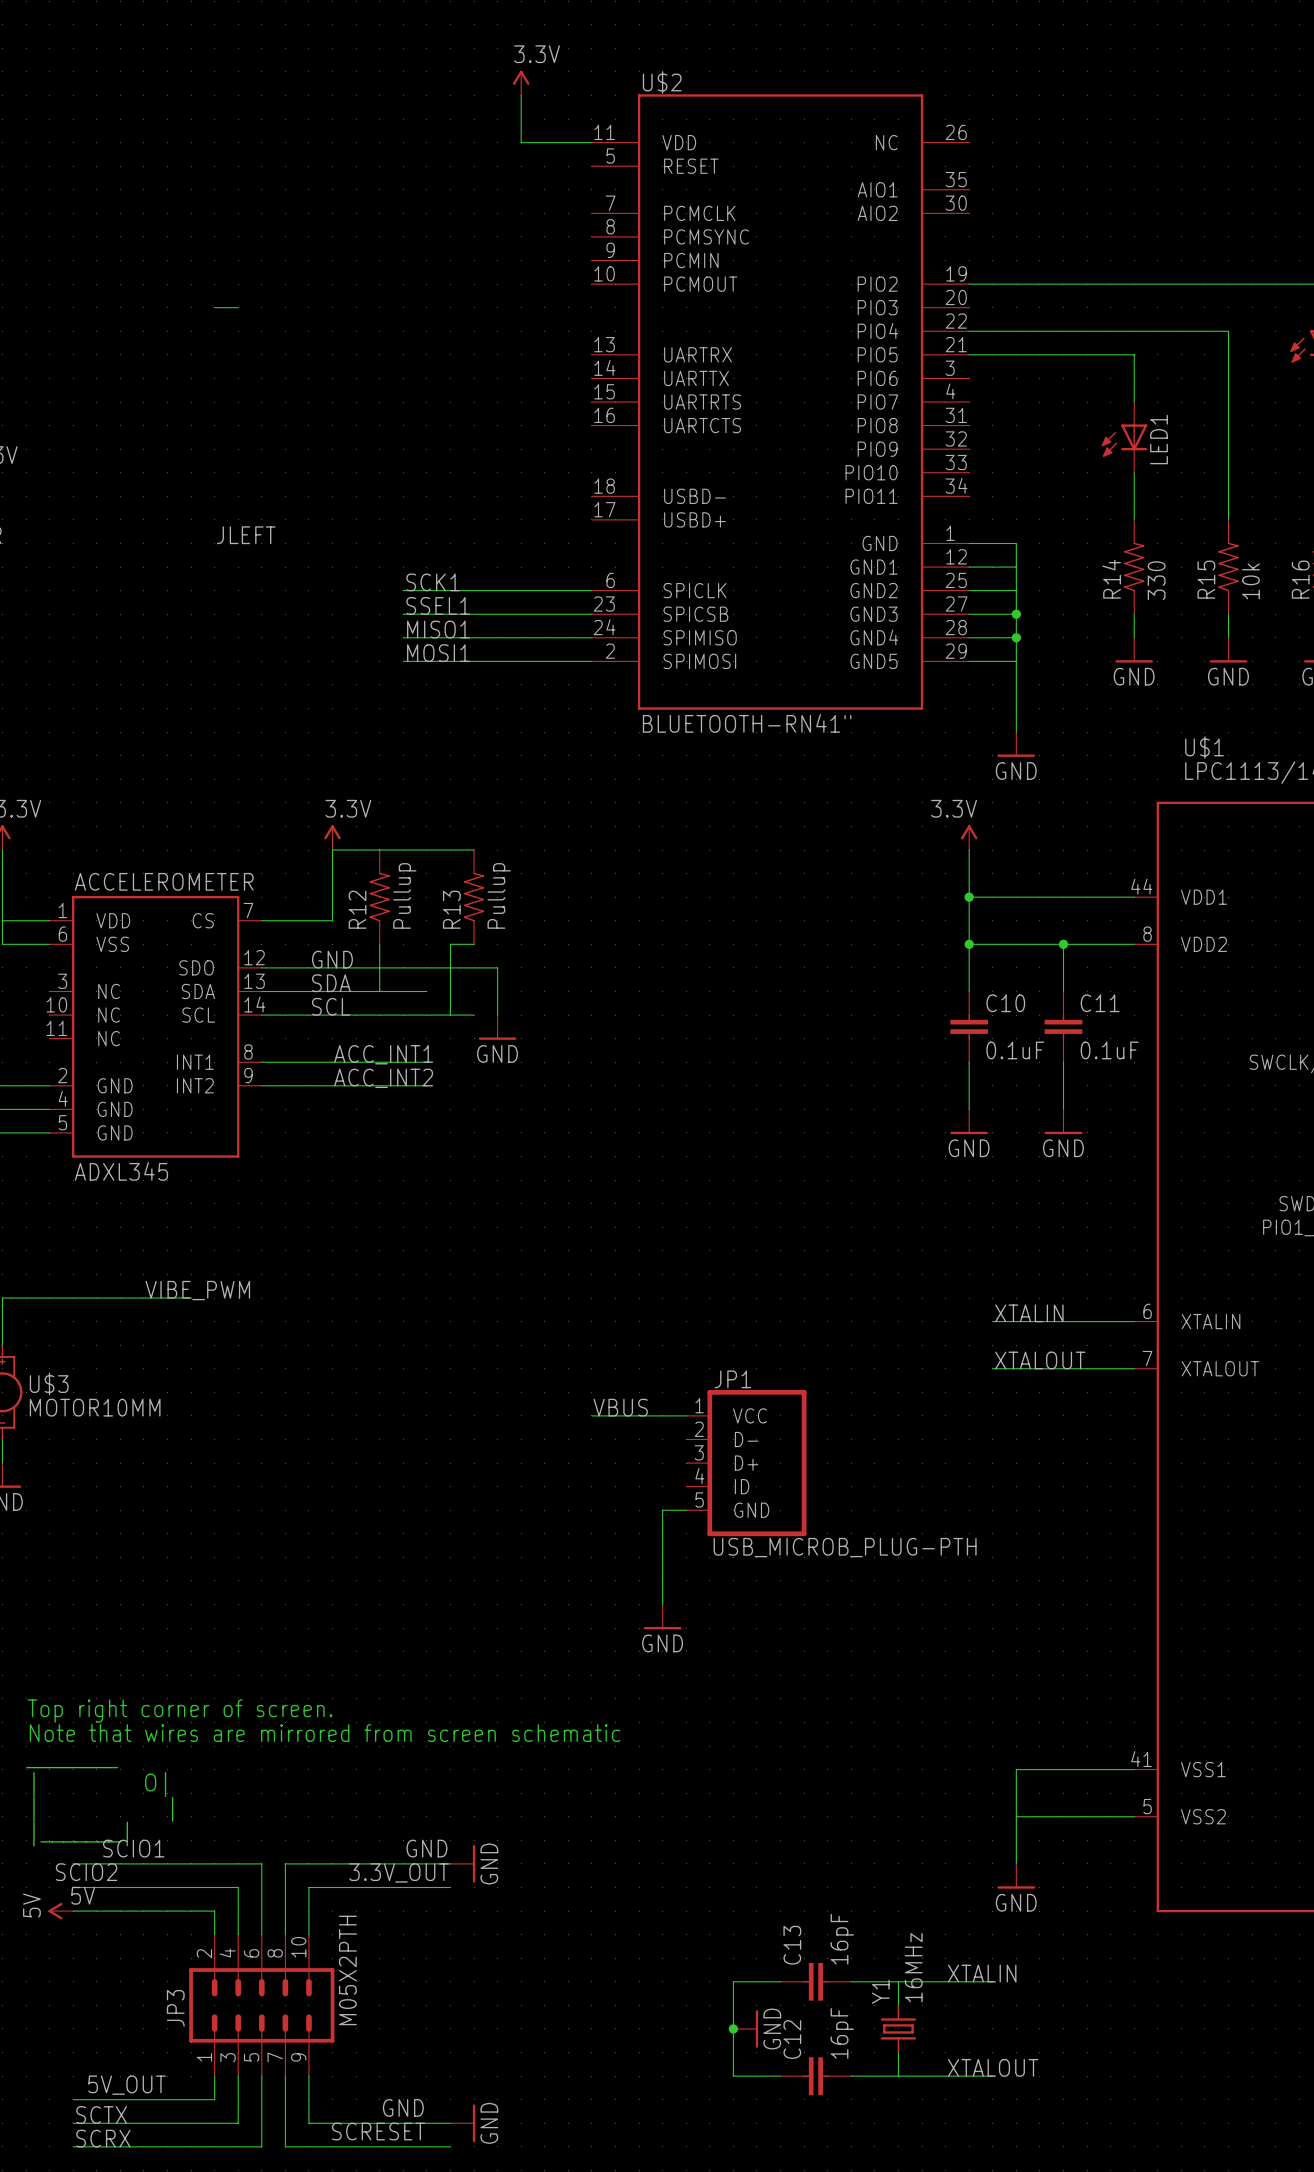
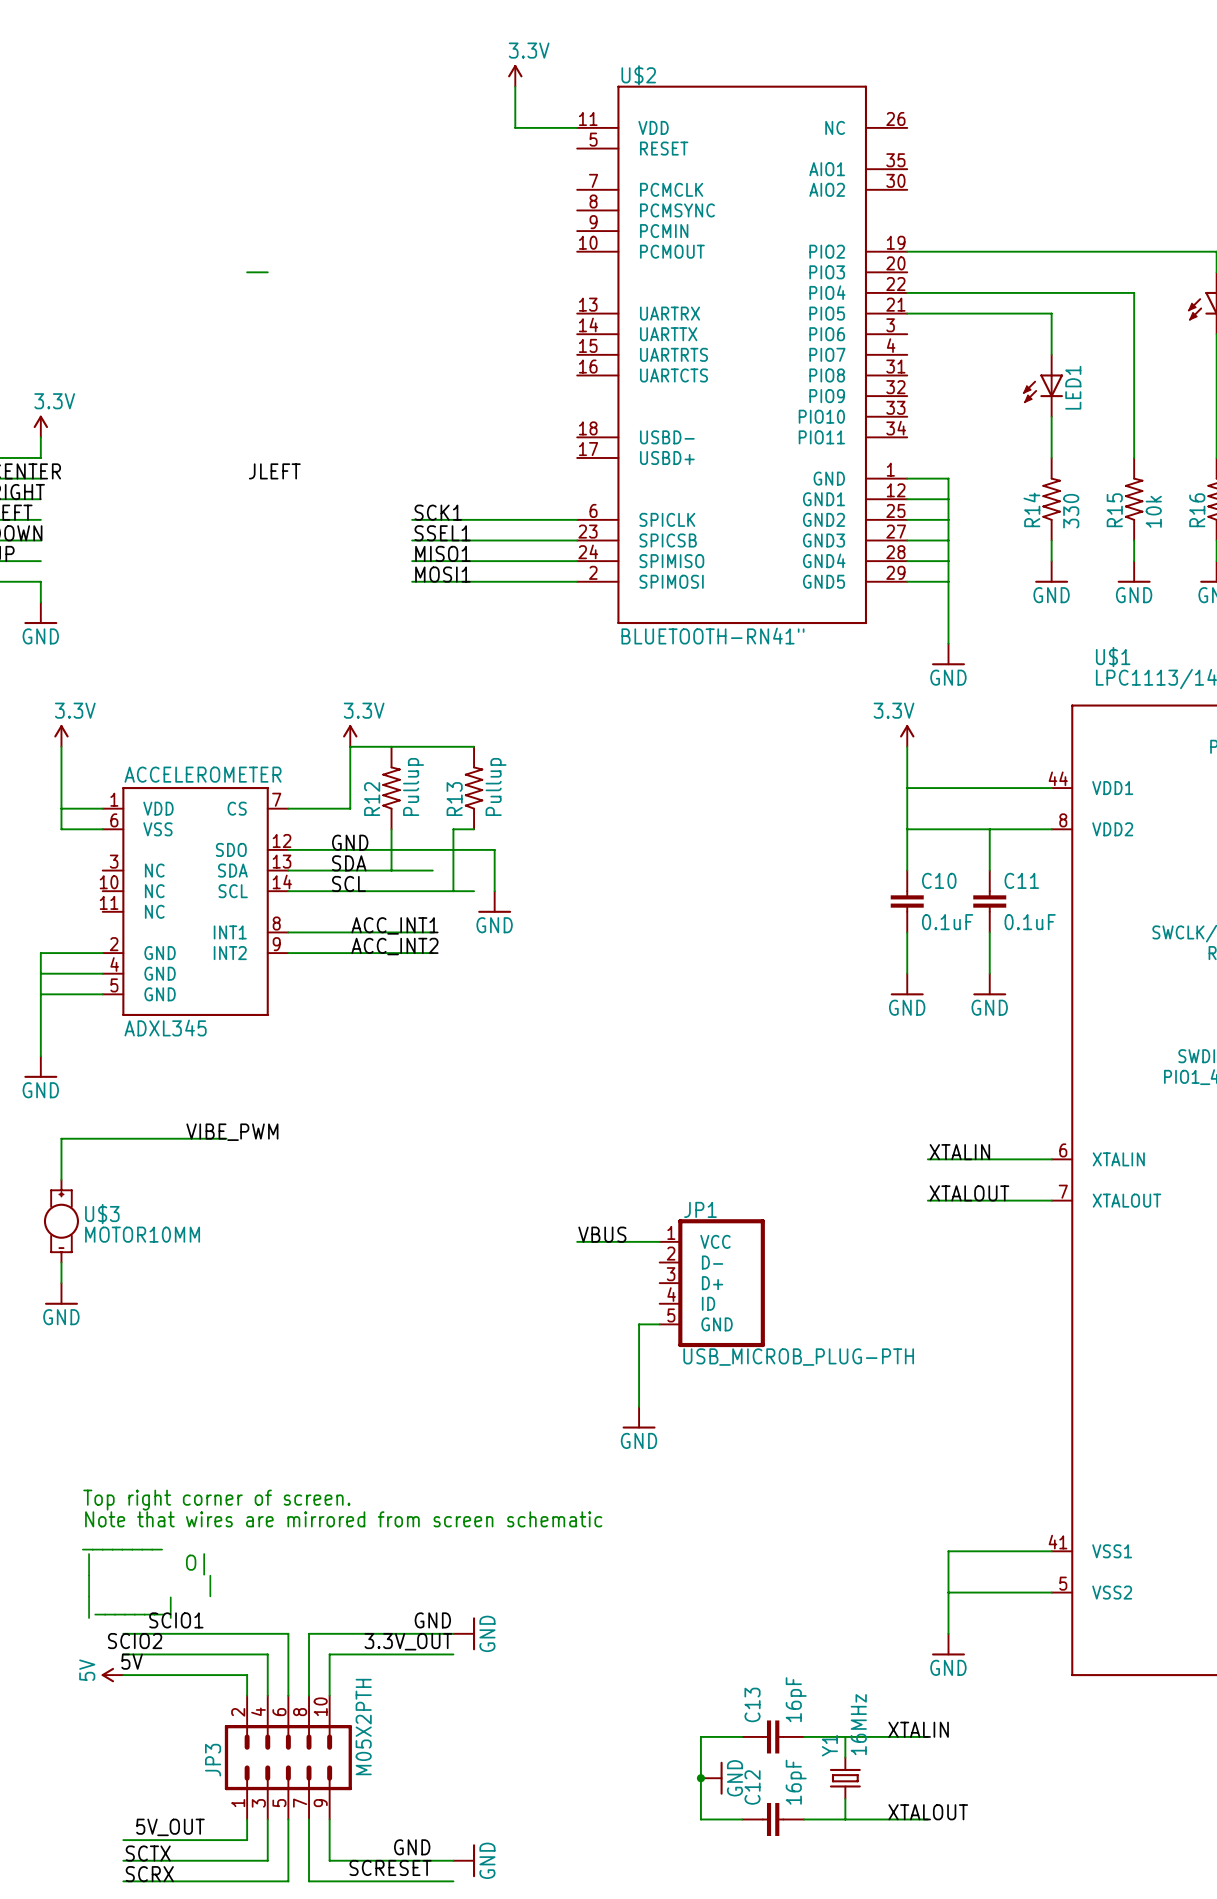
junction: (1016, 614) -> none
junction: (1016, 637) -> none
junction: (969, 897) -> none
junction: (969, 944) -> none
junction: (1063, 944) -> none

